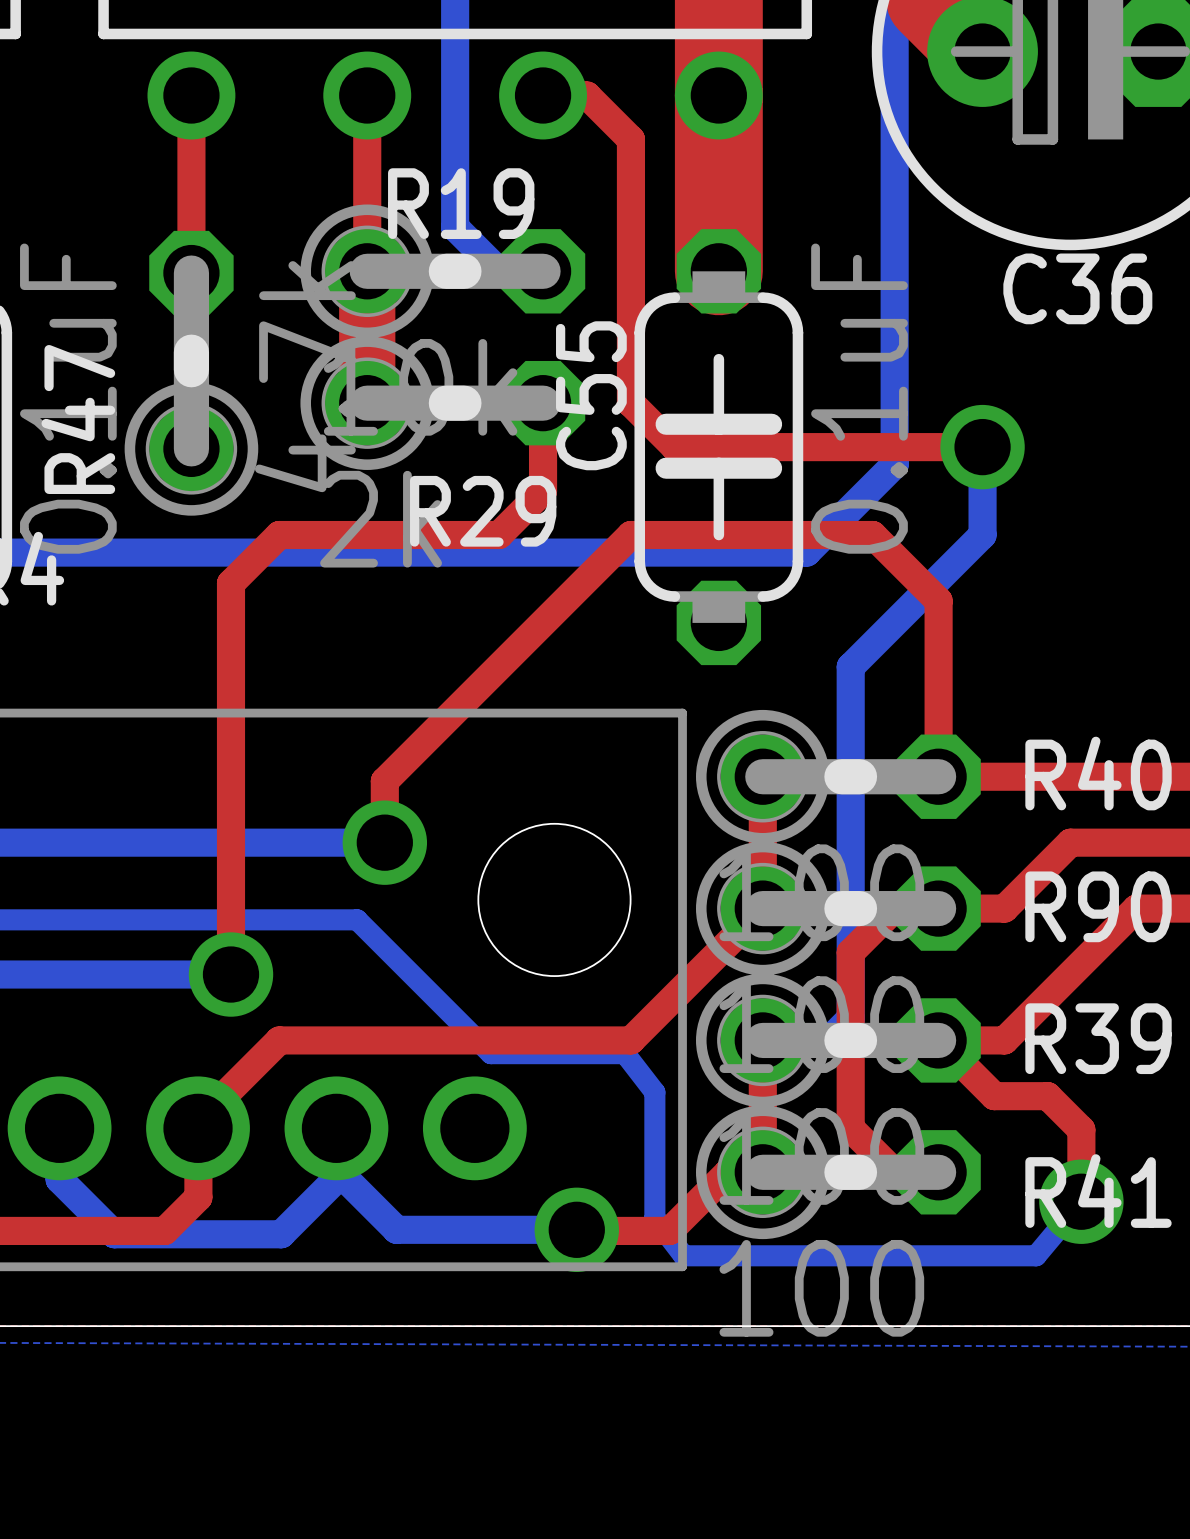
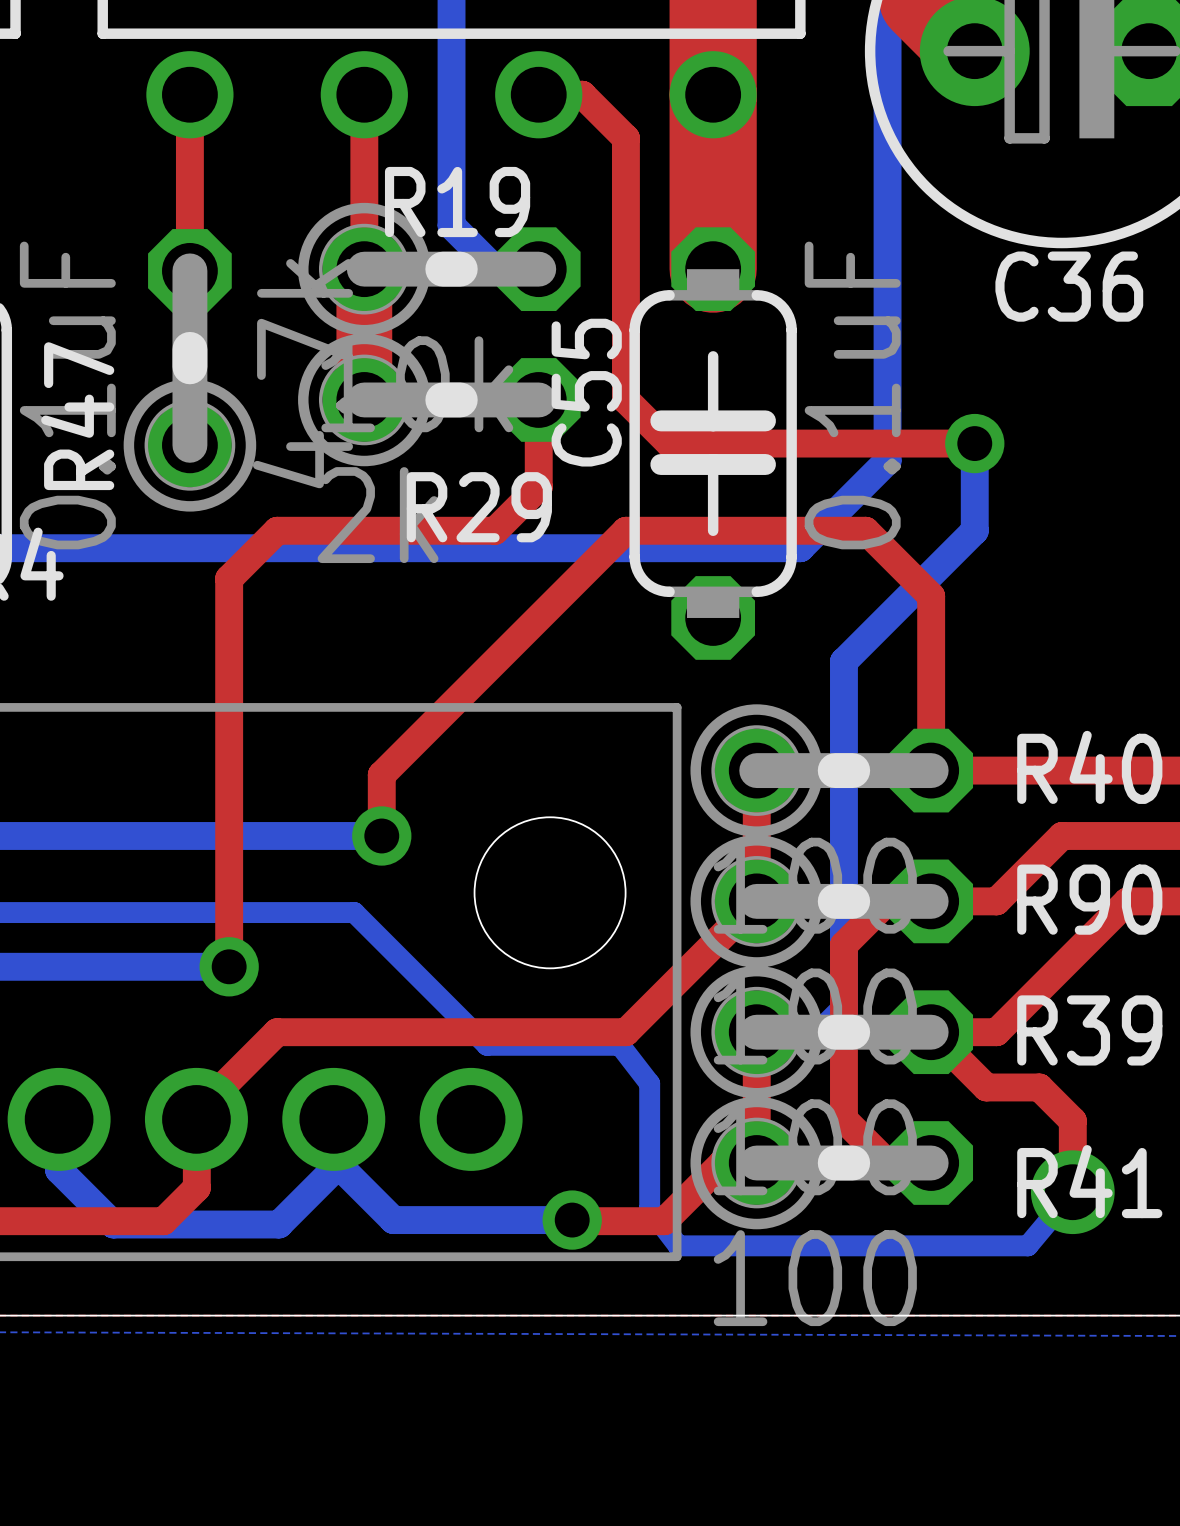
via size: [940, 404, 1025, 490] -> [945, 413, 1005, 474]
via size: [342, 800, 428, 885] -> [352, 806, 412, 866]
via size: [188, 932, 274, 1017] -> [199, 937, 259, 997]
via size: [534, 1187, 619, 1273] -> [542, 1190, 602, 1250]

